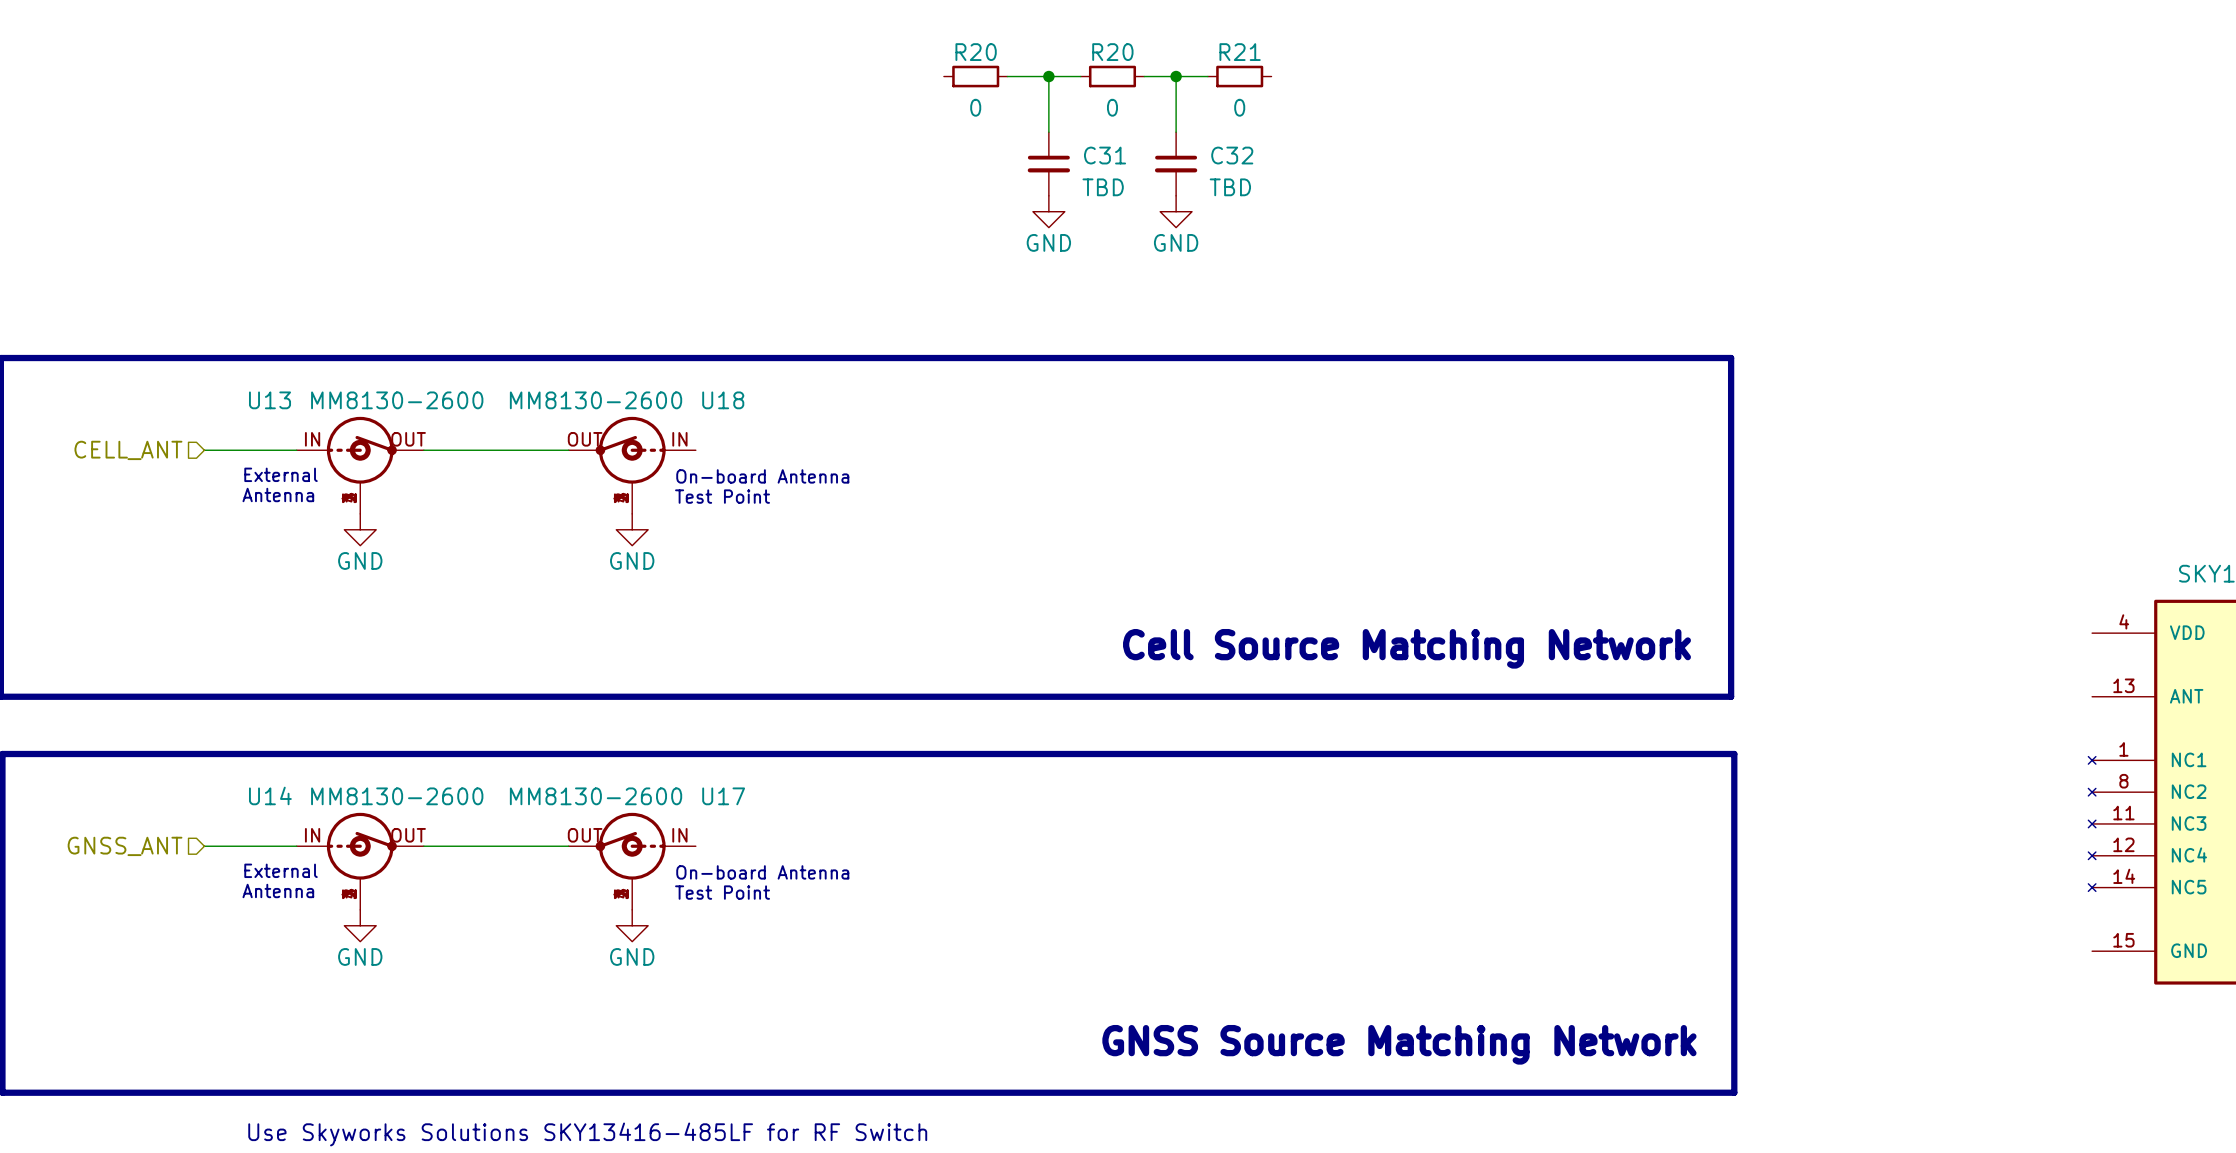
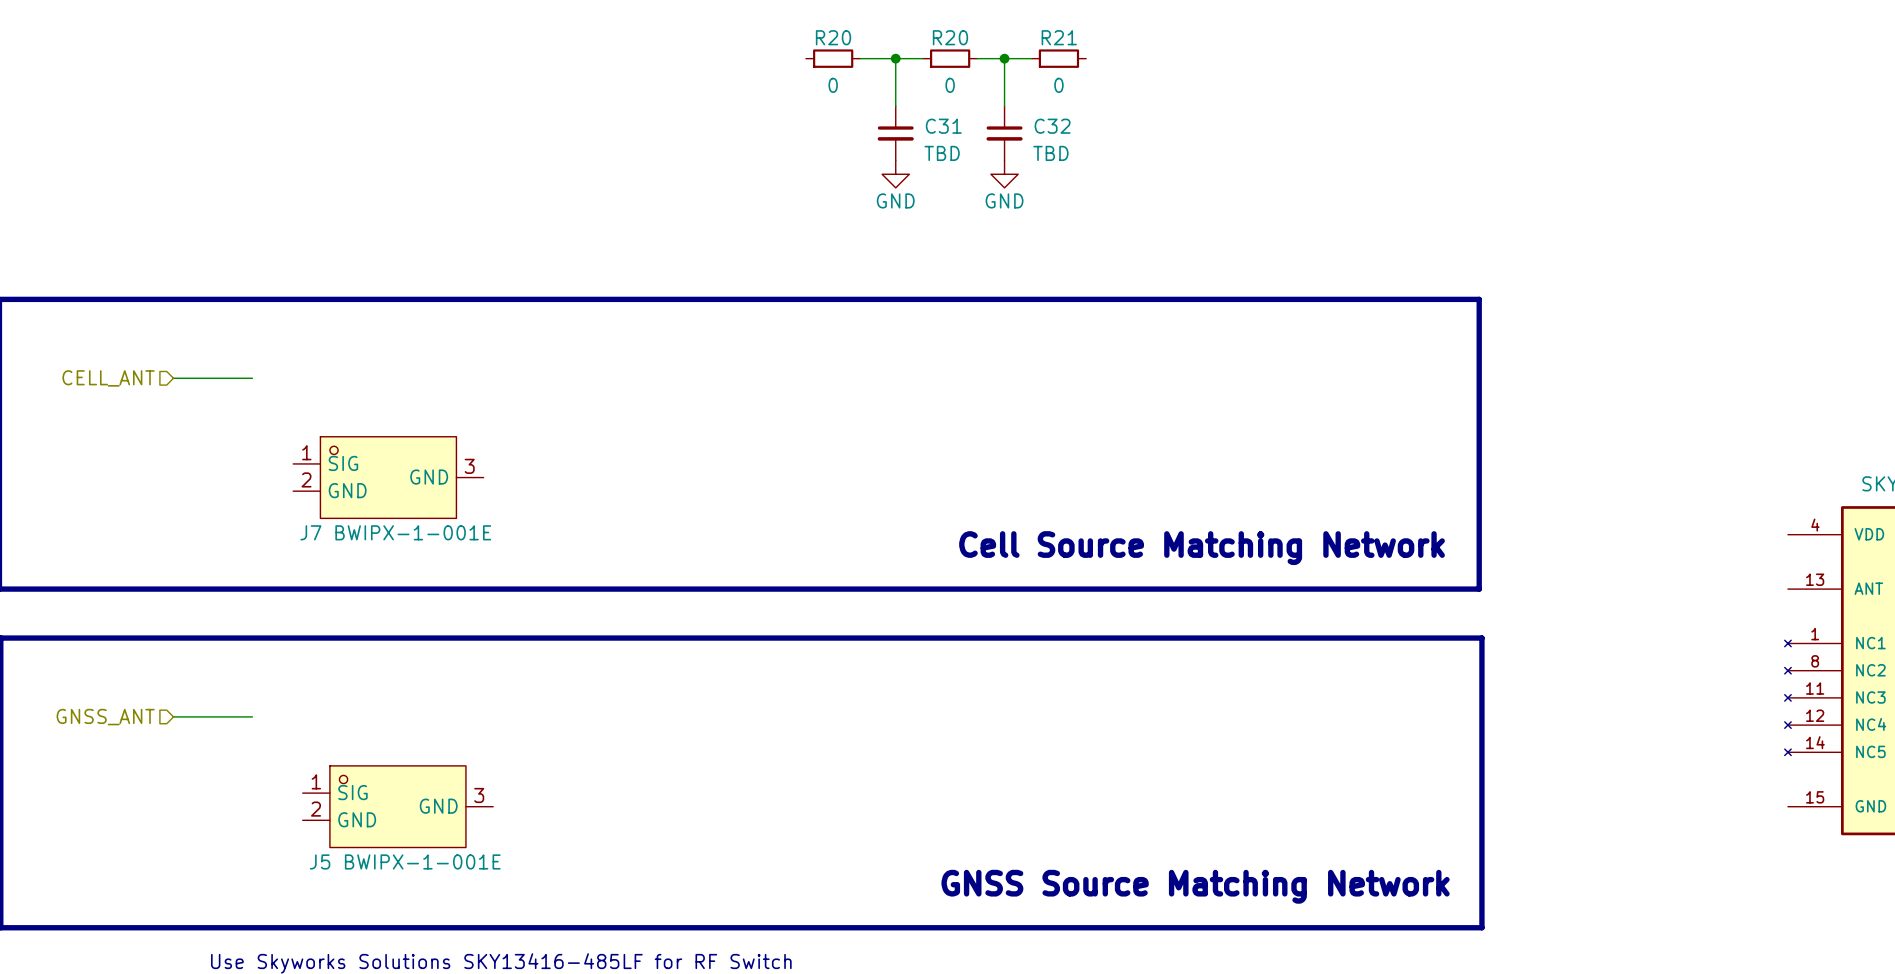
wire: (423, 450) (568, 450) -> none
U13: MM8130-2600 (360, 465) -> none
U18: MM8130-2600 (632, 465) -> none
text: External (281, 474) -> none
text: On-board Antenna (762, 476) -> none
text: Antenna (278, 494) -> none
text: Test Point (722, 496) -> none
power symbol: GND (360, 529) -> none
power symbol: GND (632, 529) -> none
J7: none -> BWIPX-1-001E (388, 477)
wire: (423, 846) (568, 846) -> none
U14: MM8130-2600 (360, 861) -> none
U17: MM8130-2600 (632, 861) -> none
text: External (281, 870) -> none
text: On-board Antenna (762, 872) -> none
text: Antenna (278, 890) -> none
text: Test Point (722, 892) -> none
power symbol: GND (360, 925) -> none
power symbol: GND (632, 925) -> none
J5: none -> BWIPX-1-001E (397, 806)

